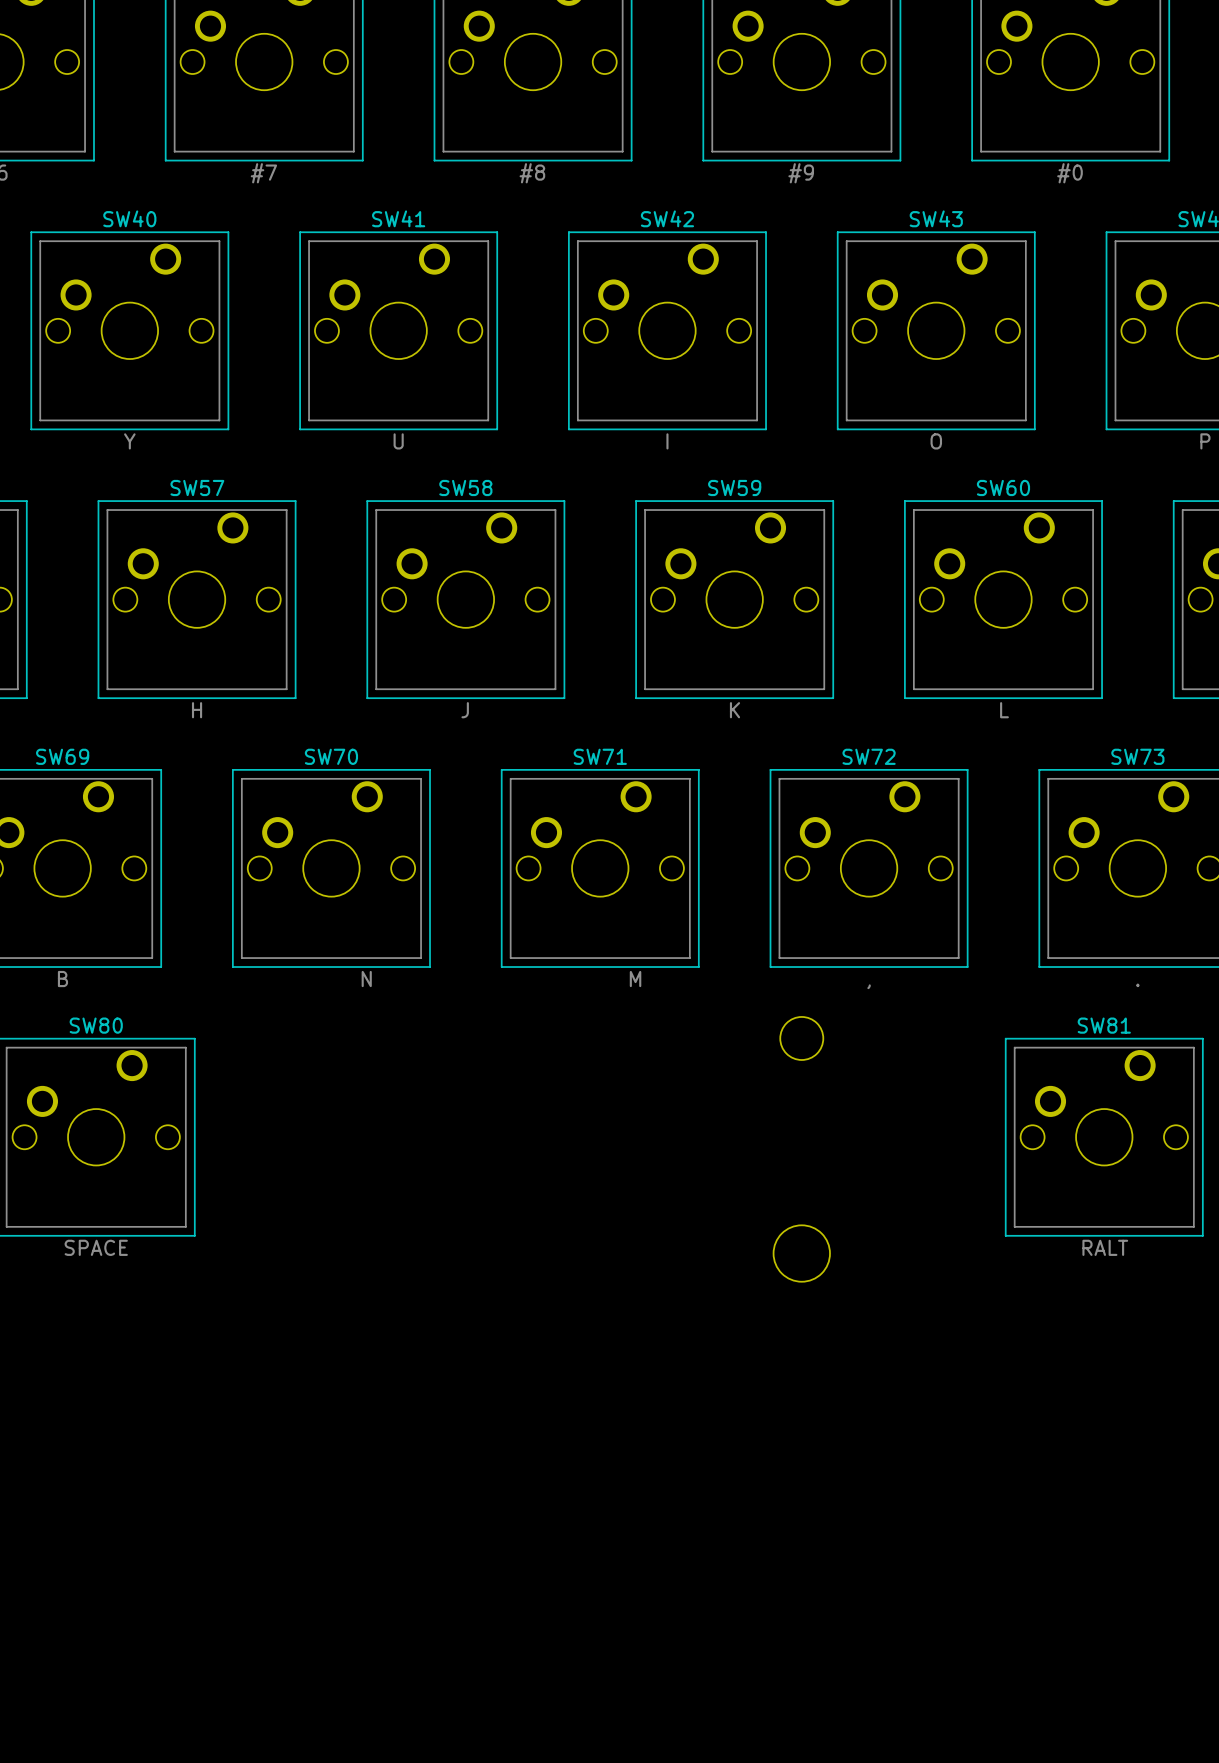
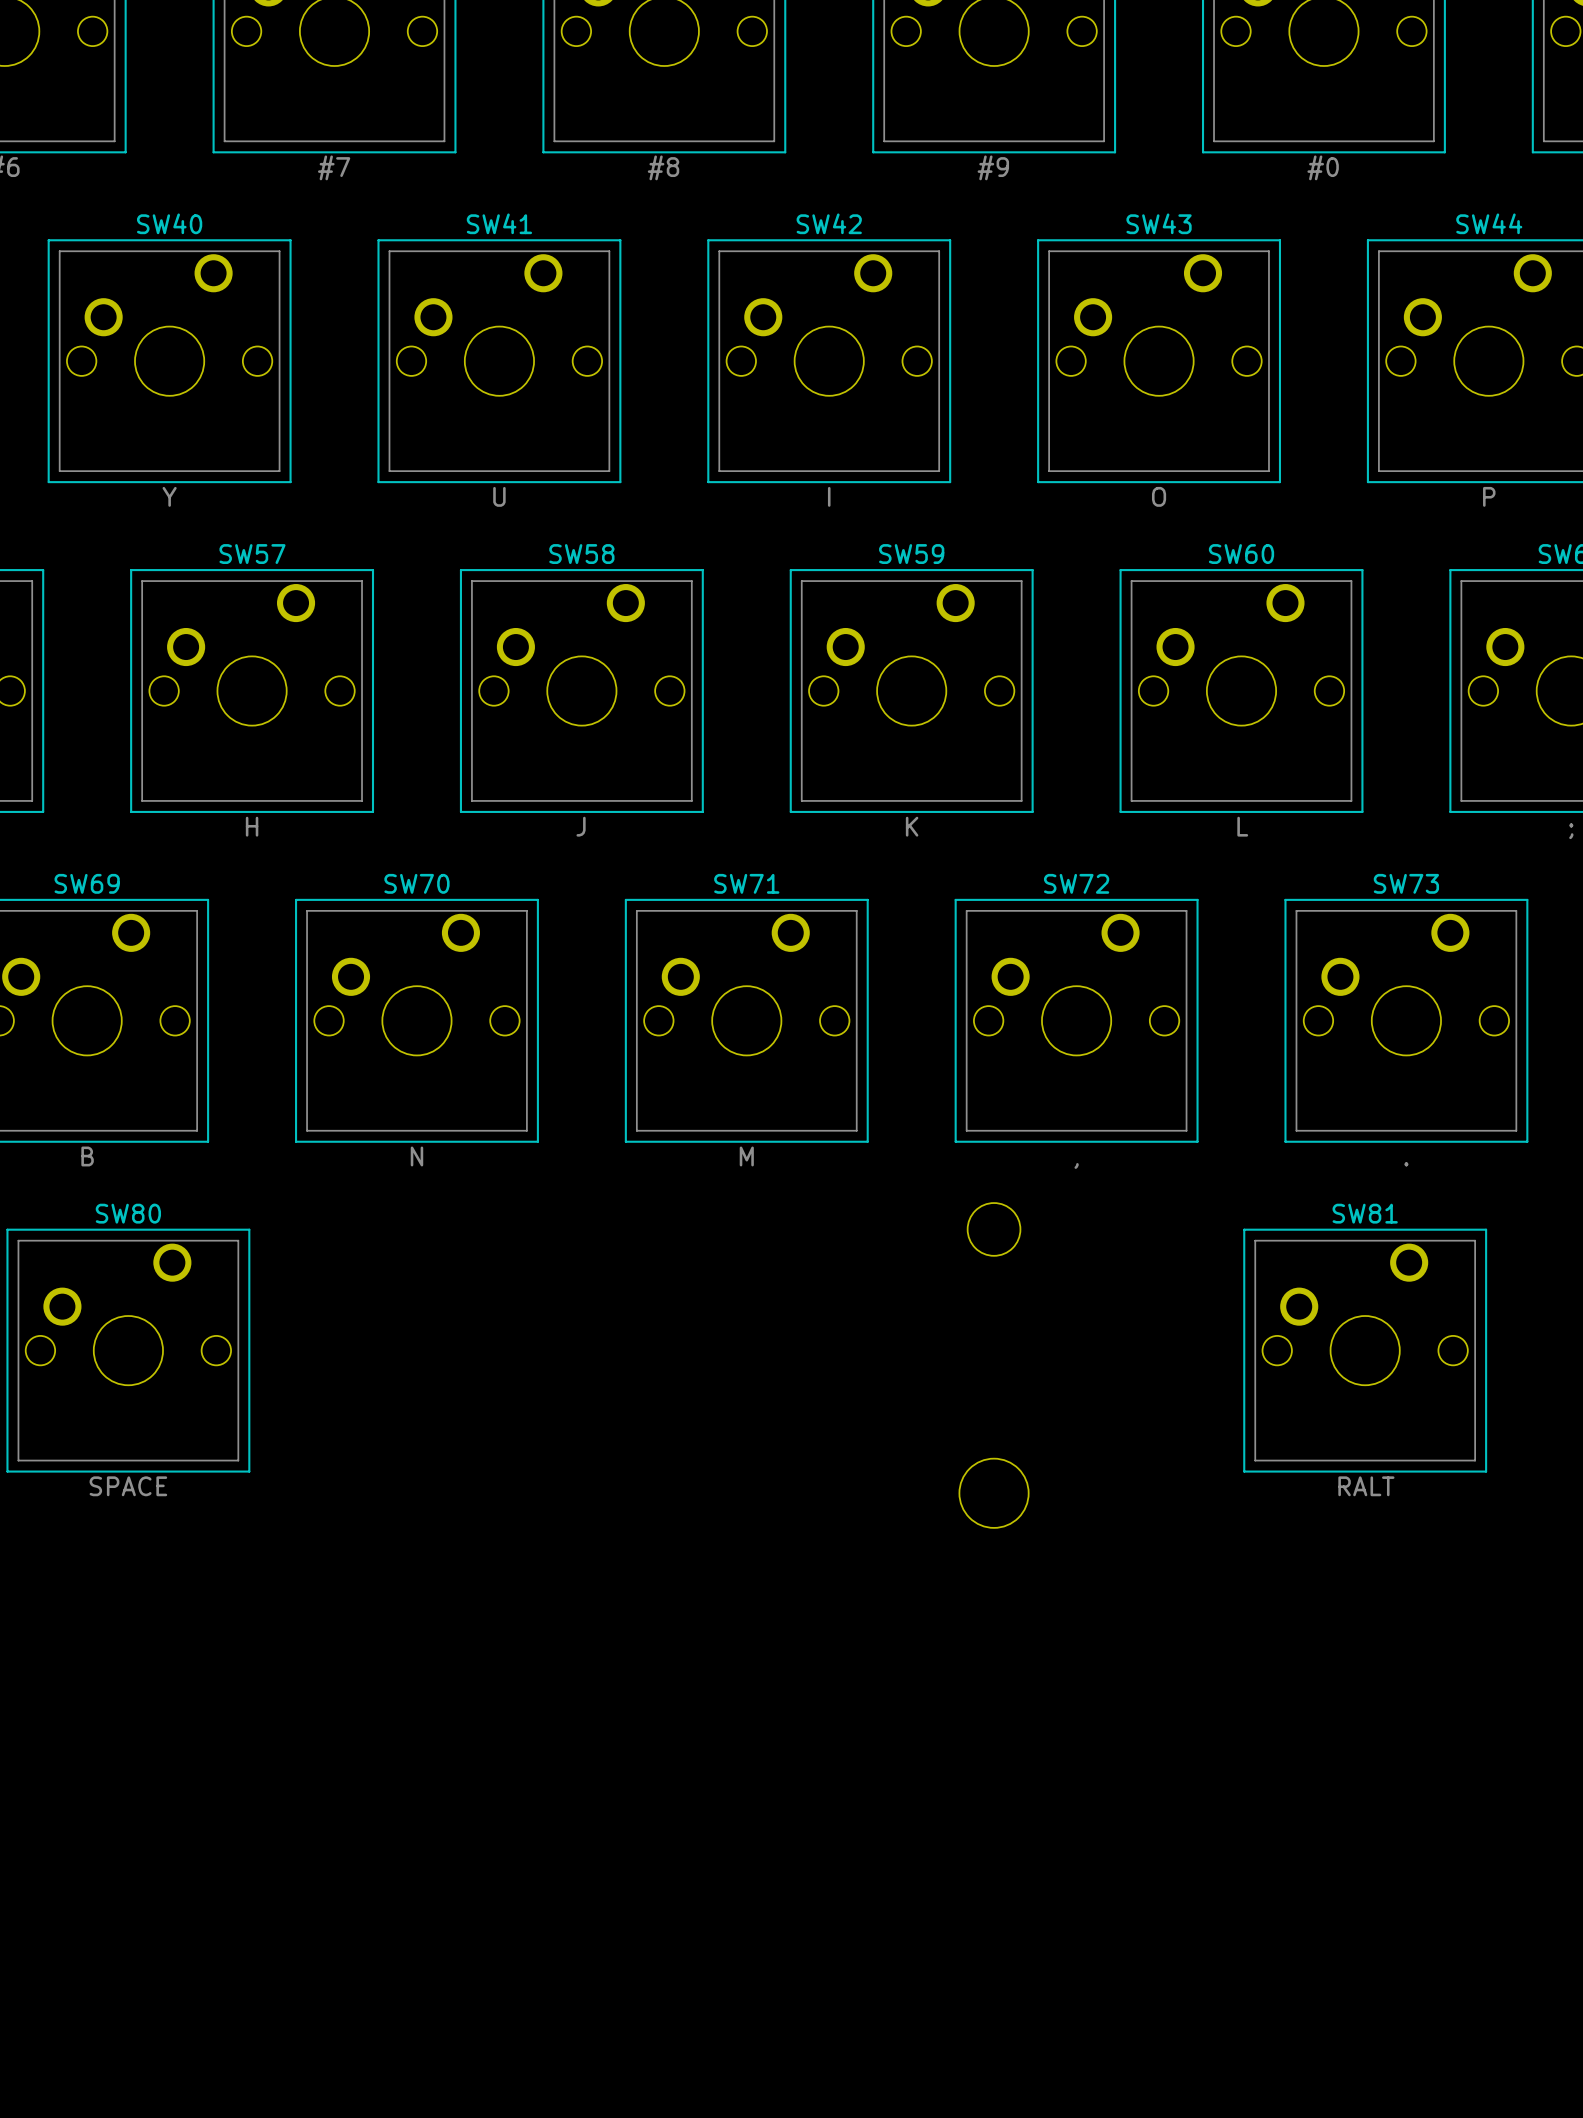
SW70 value position: N (366, 979) -> N (416, 1156)
SW71 value position: M (635, 979) -> M (746, 1156)

